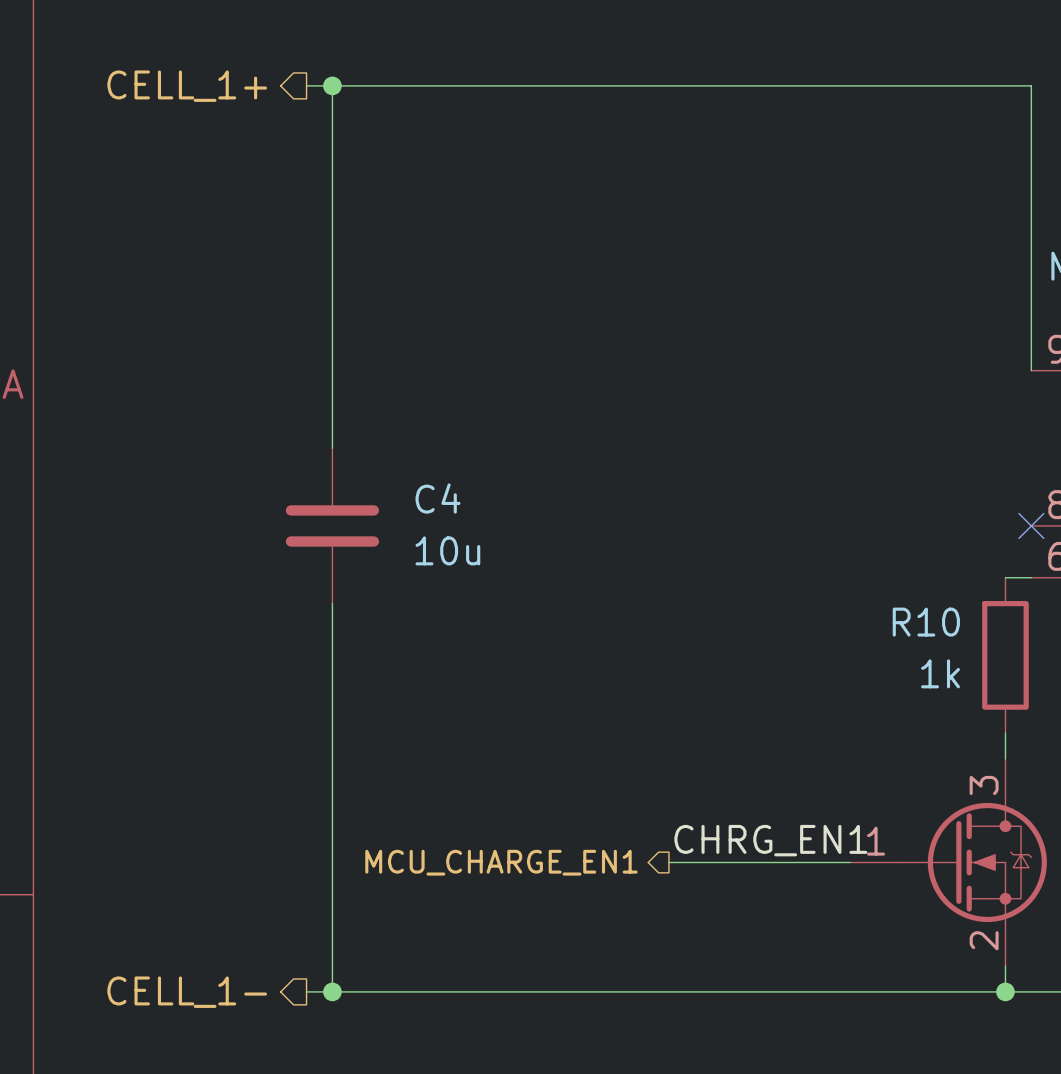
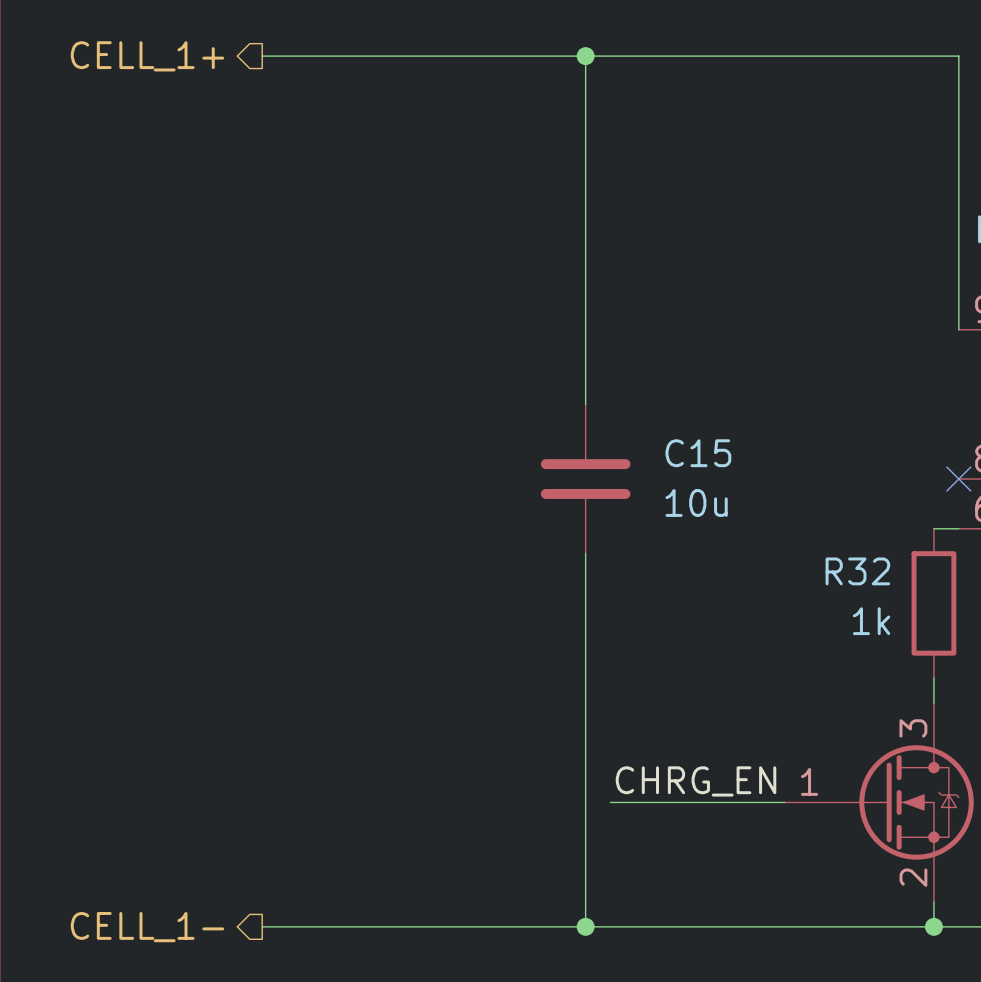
wire: (332, 85) (332, 448) -> (585, 56) (585, 404)
junction: (332, 85) -> none
junction: none -> (585, 56)
C4: 10u (332, 525) -> none
C15: none -> 10u (585, 479)
wire: (332, 603) (332, 991) -> (585, 553) (585, 926)
R10 name: R10 (926, 622) -> R32 (857, 571)
label: CHRG_EN1 (770, 840) -> CHRG_EN (696, 781)
hierarchical label: MCU_CHARGE_EN1 (501, 862) -> none
junction: (332, 991) -> none
junction: none -> (585, 926)

